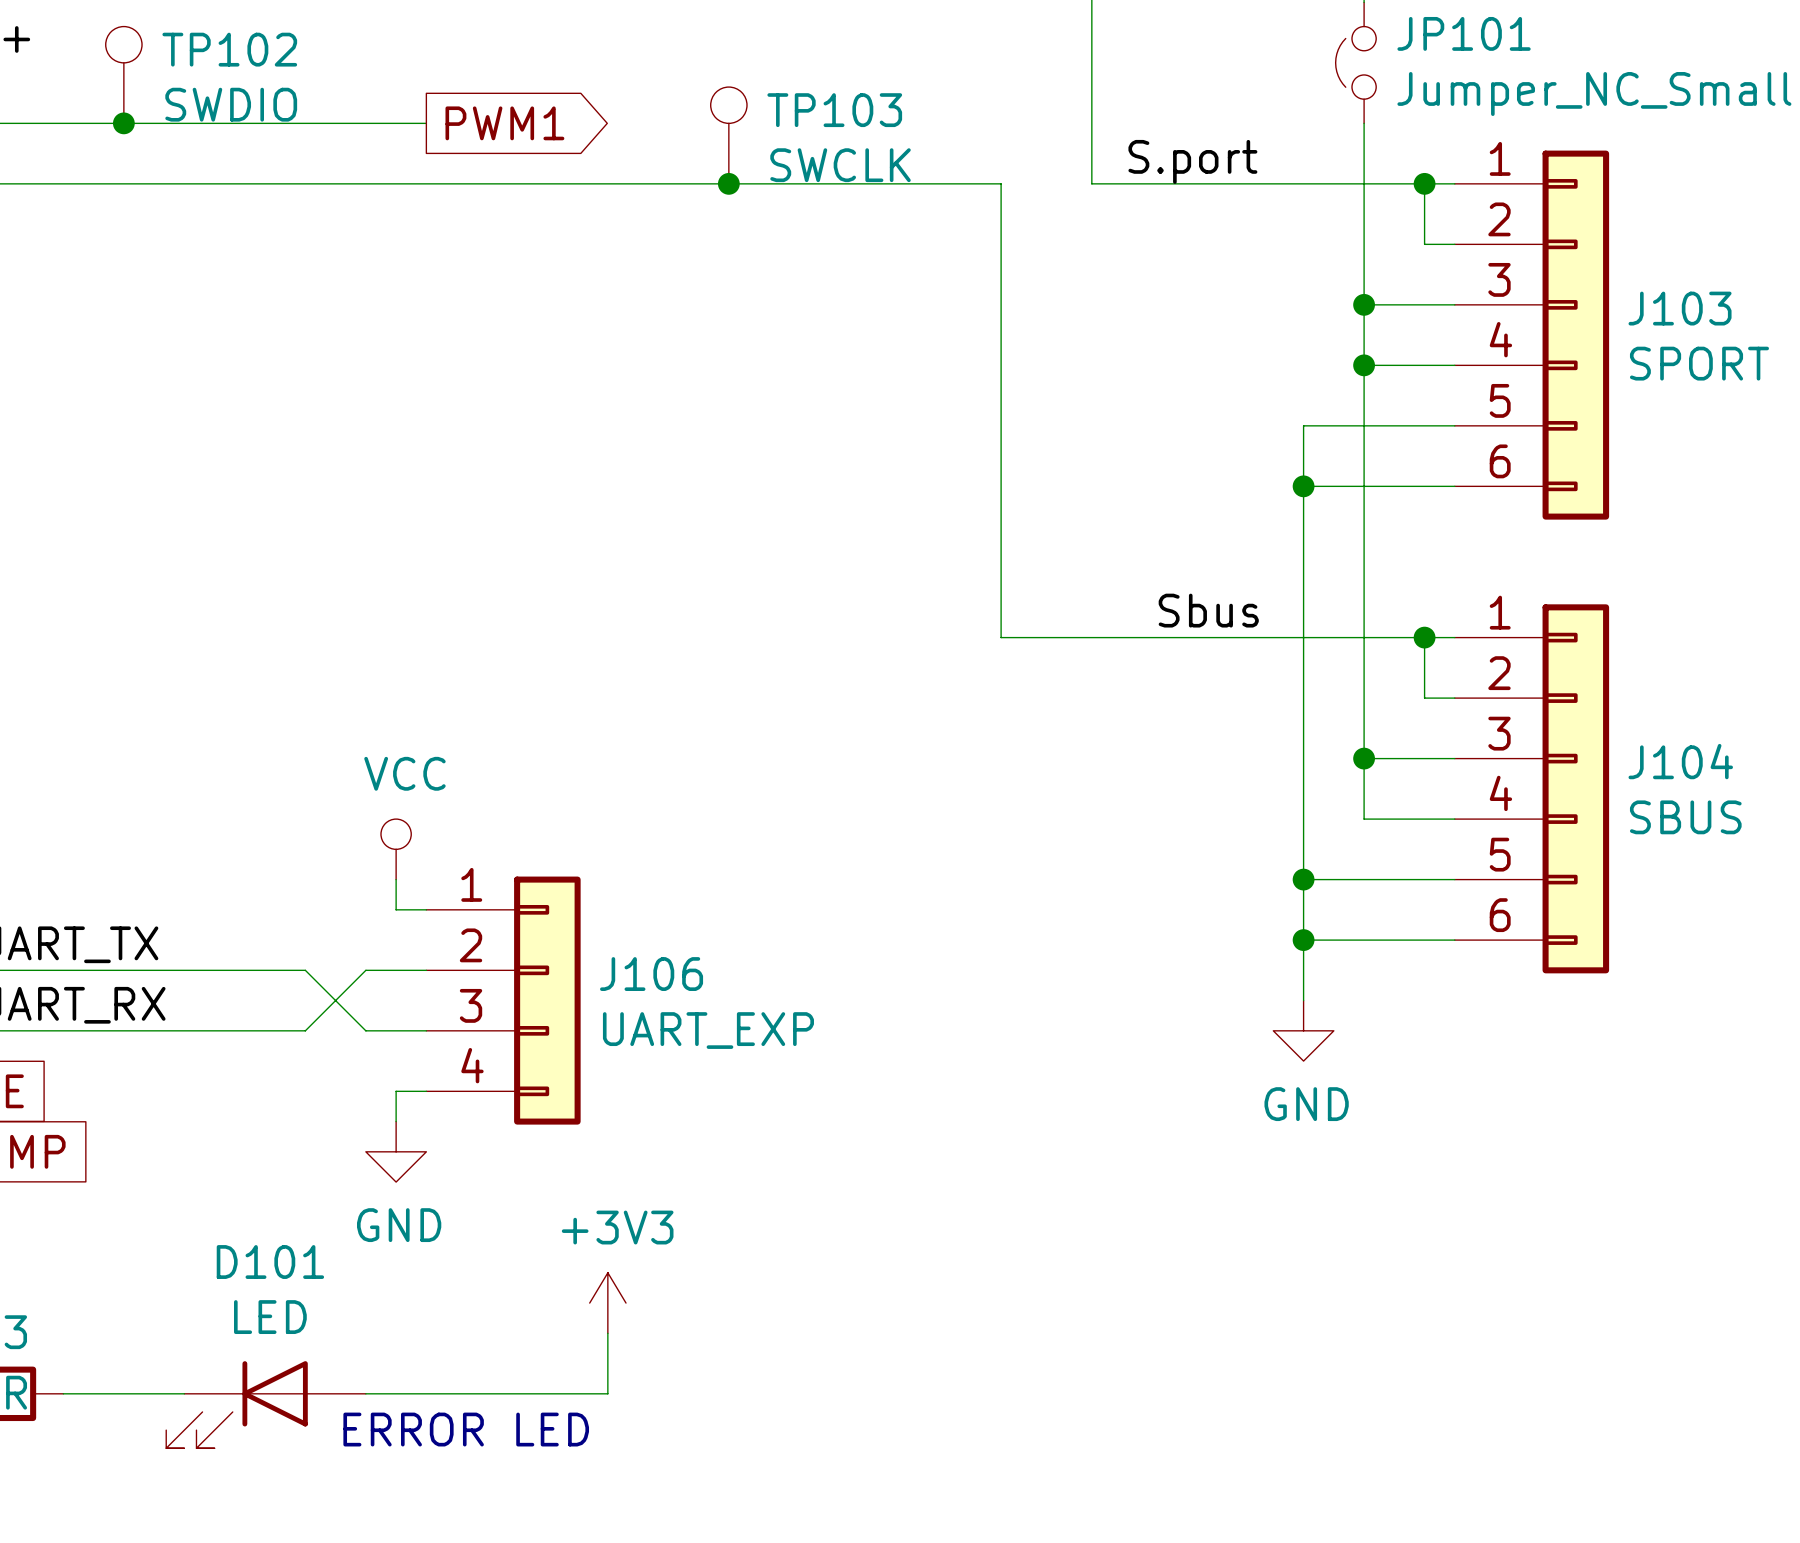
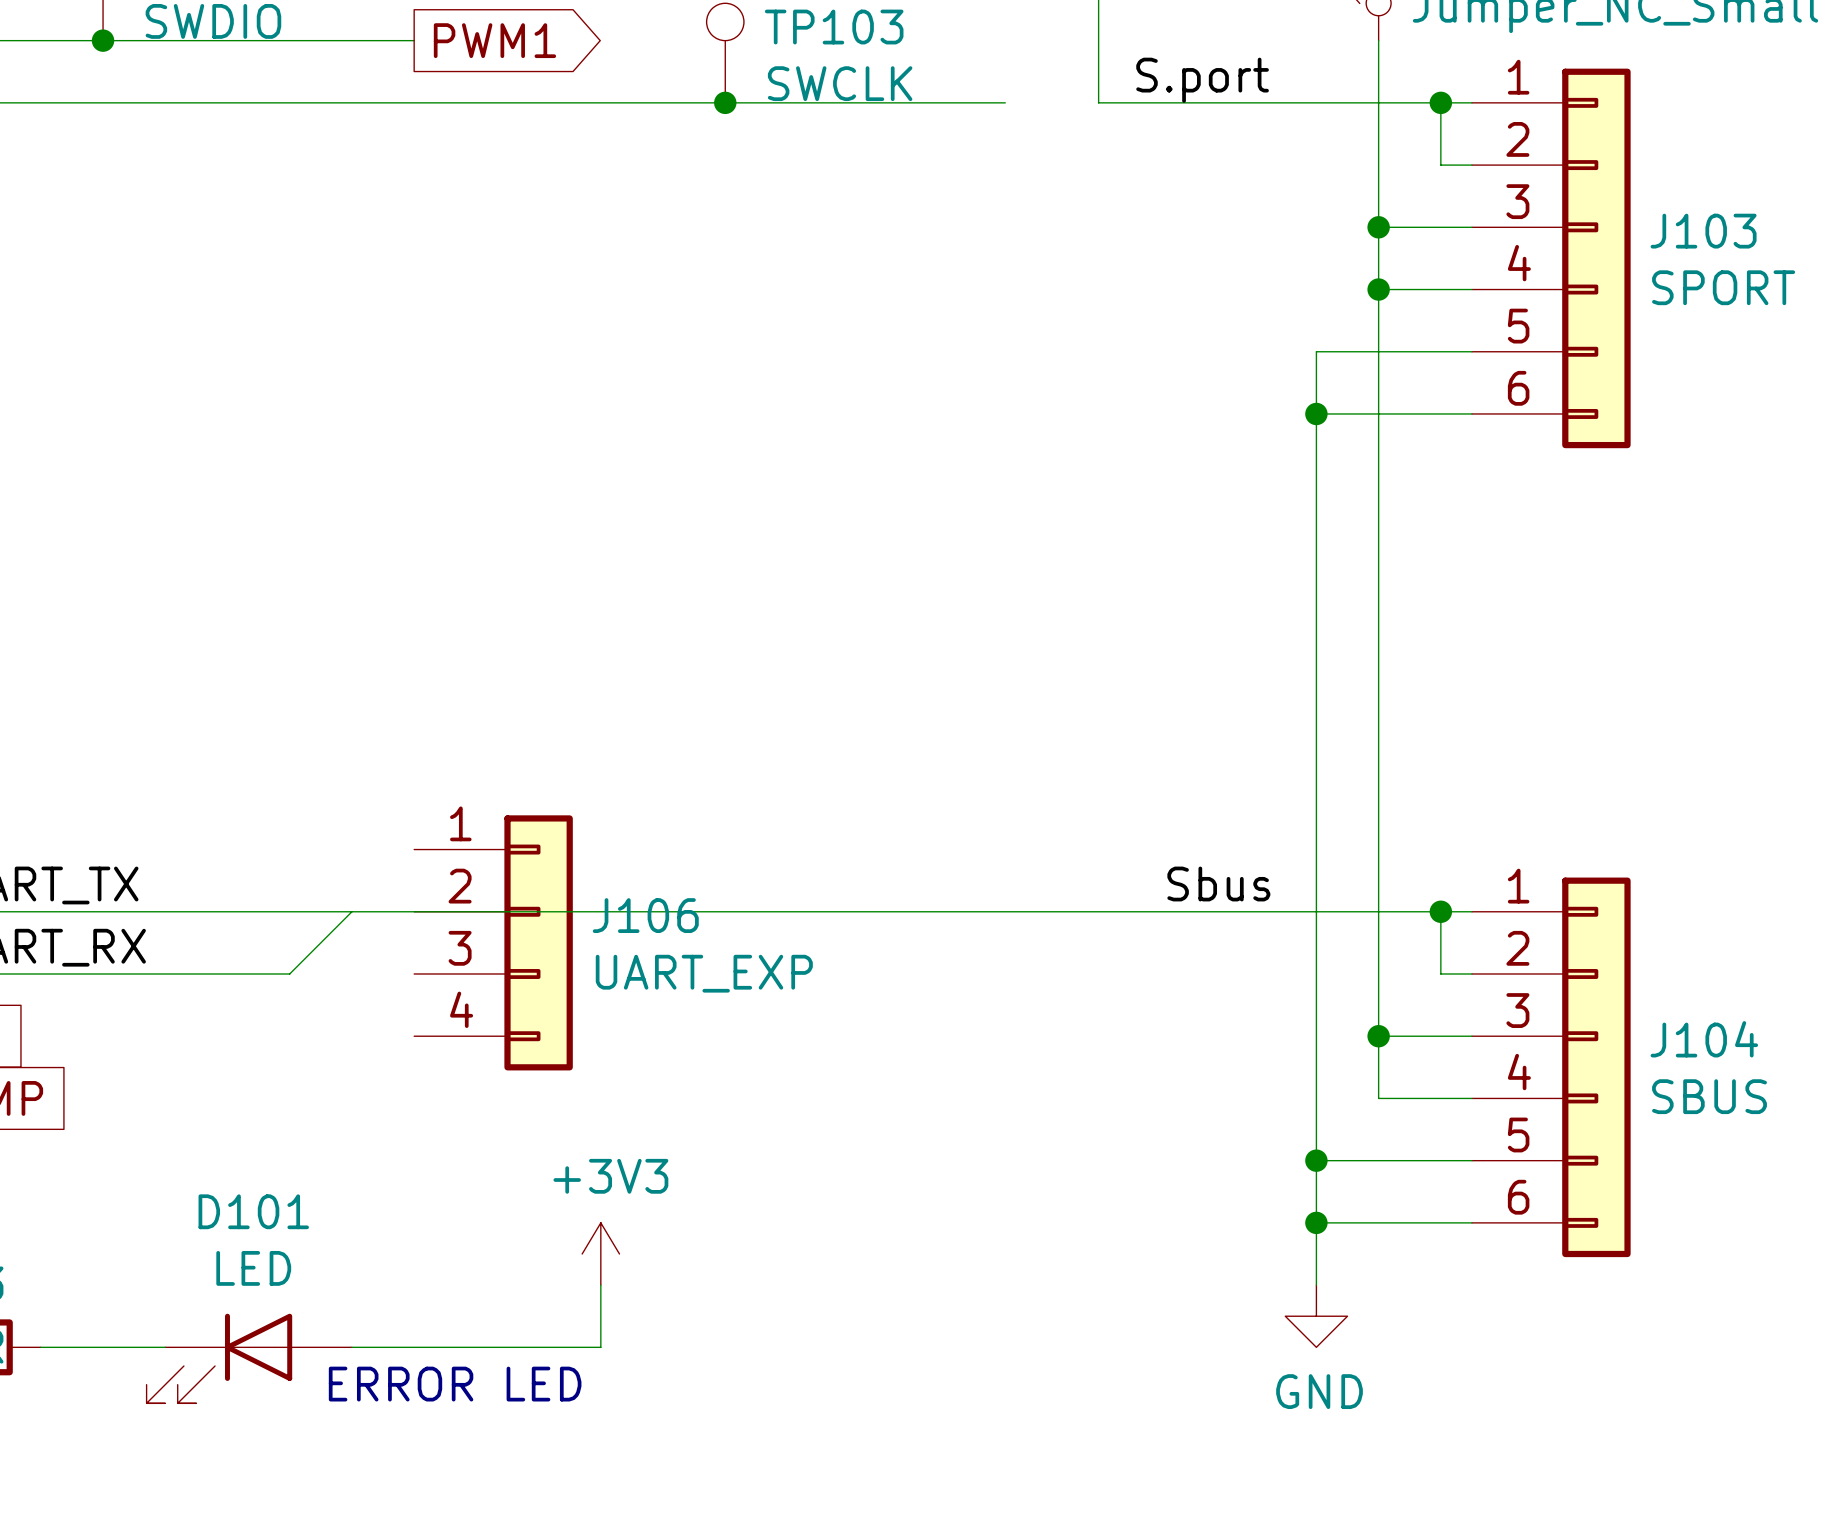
wire: (1001, 183) (1001, 637) (1454, 637) -> none
label position: Sbus (1208, 610) -> Sbus (1218, 884)
wire: (1424, 637) (1424, 698) (1454, 698) -> (1440, 911) (1440, 973) (1471, 973)
junction: (1424, 637) -> none
wire: (1364, 758) (1454, 758) -> (1378, 1036) (1471, 1036)
junction: (1364, 758) -> none
J104 position: (1531, 788) -> (1551, 1067)
wire: (1364, 819) (1454, 819) -> (1378, 756) (1378, 1098) (1471, 1098)
power symbol: VCC (396, 849) -> none
wire: (396, 879) (396, 909) (426, 909) -> none
wire: (1303, 879) (1454, 879) -> (1316, 1160) (1471, 1160)
junction: (1303, 879) -> none
wire: (1303, 940) (1454, 940) -> (1316, 1222) (1471, 1222)
junction: (1303, 940) -> none
wire: (305, 970) (365, 1030) (426, 1030) -> (289, 911) (351, 911)
wire: none -> (414, 911) (1471, 911)
junction: none -> (1440, 911)
wire: none -> (1316, 942) (1316, 1285)
power symbol position: GND (1303, 1030) -> GND (1316, 1316)
wire: (426, 1091) (396, 1091) (396, 1121) -> none
junction: none -> (1378, 1036)
power symbol: GND (396, 1151) -> none
junction: none -> (1316, 1160)
junction: none -> (1316, 1222)

